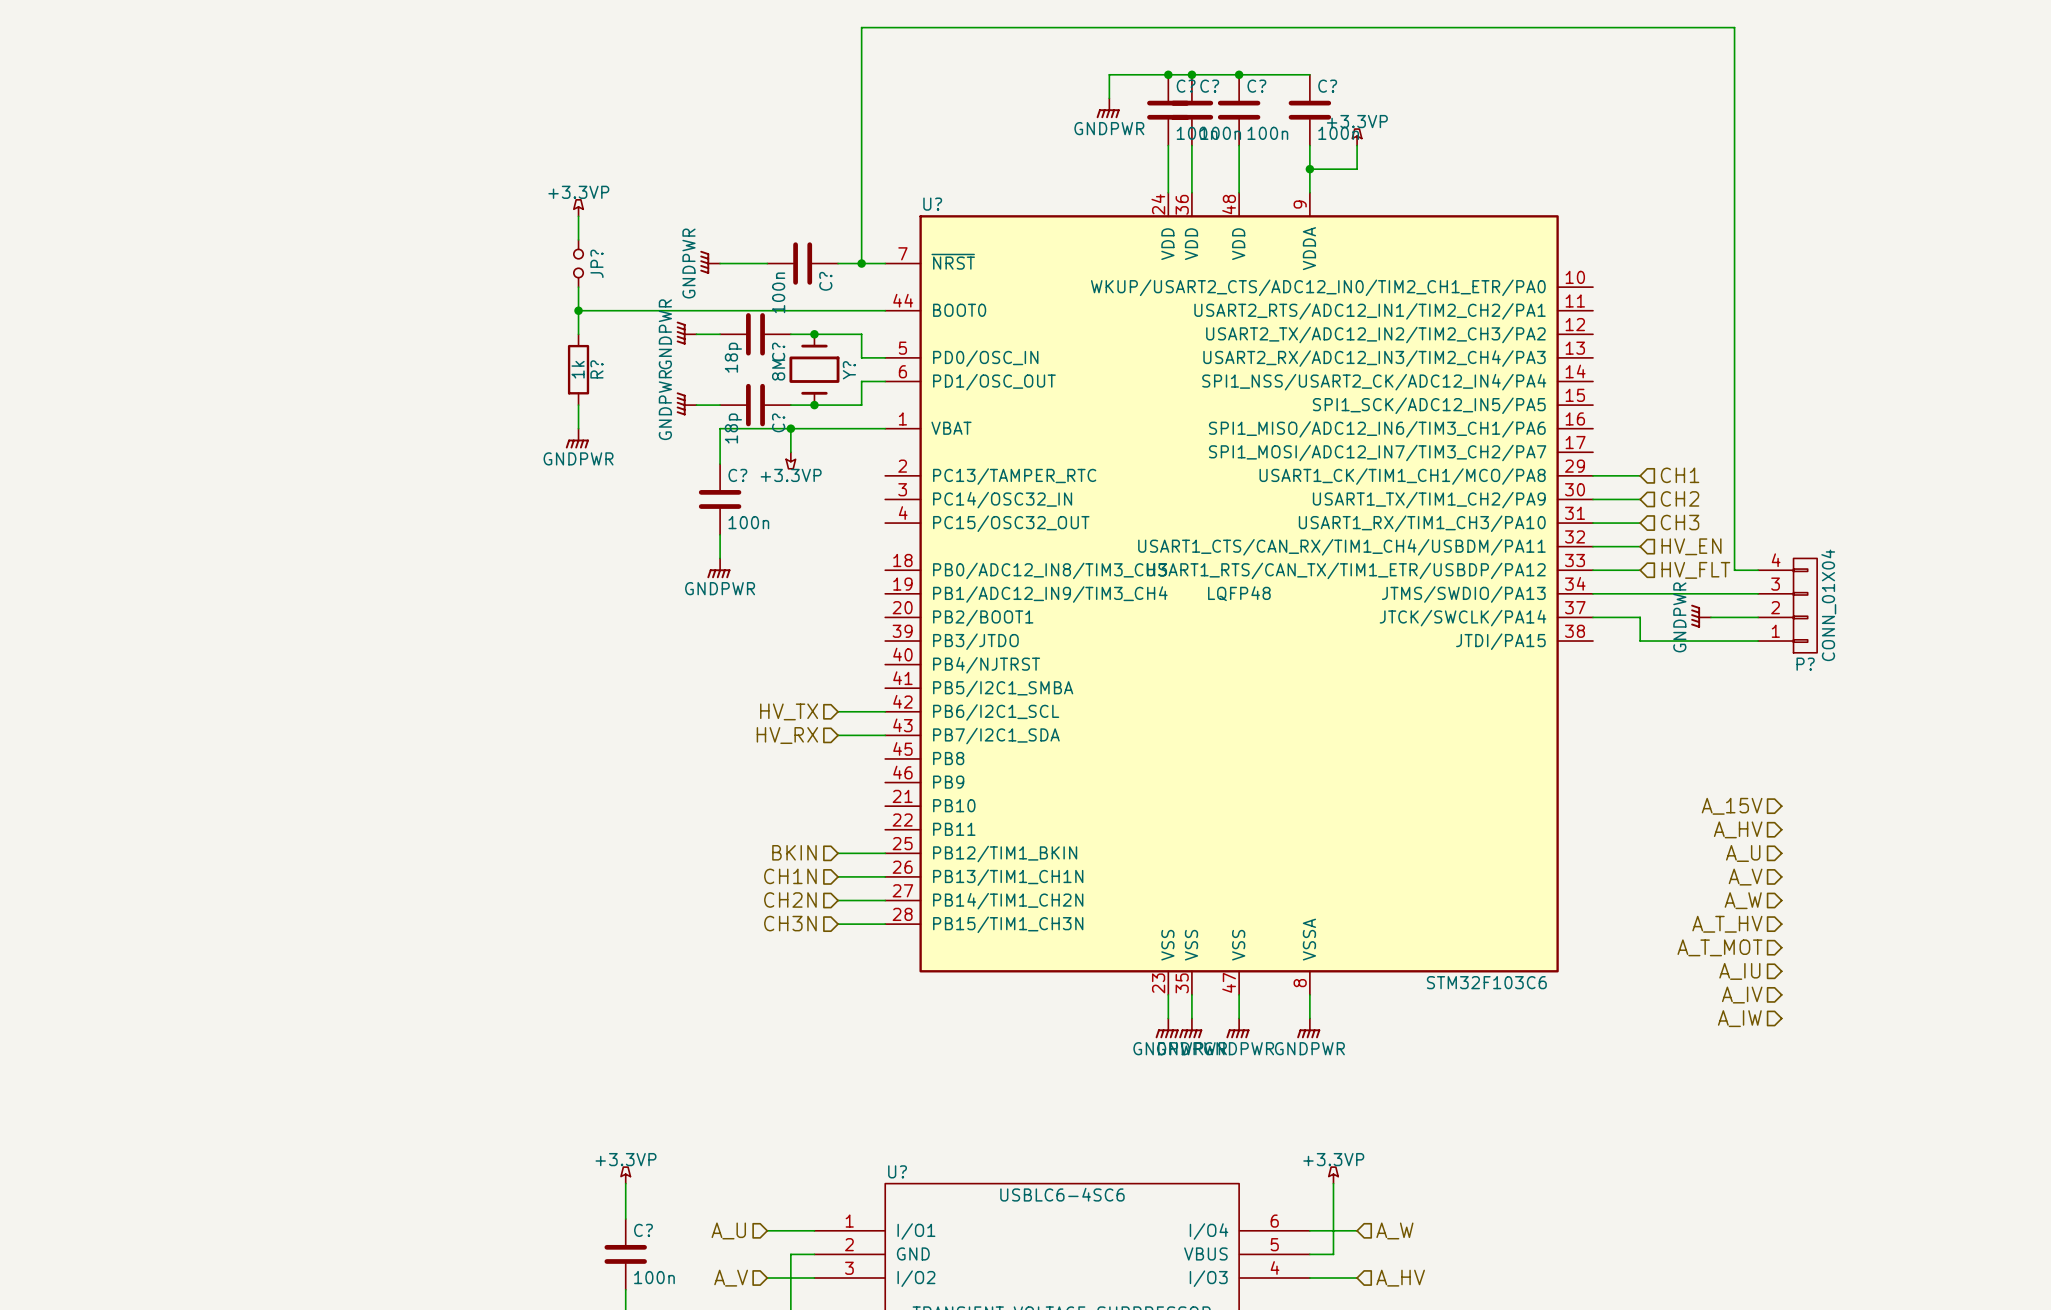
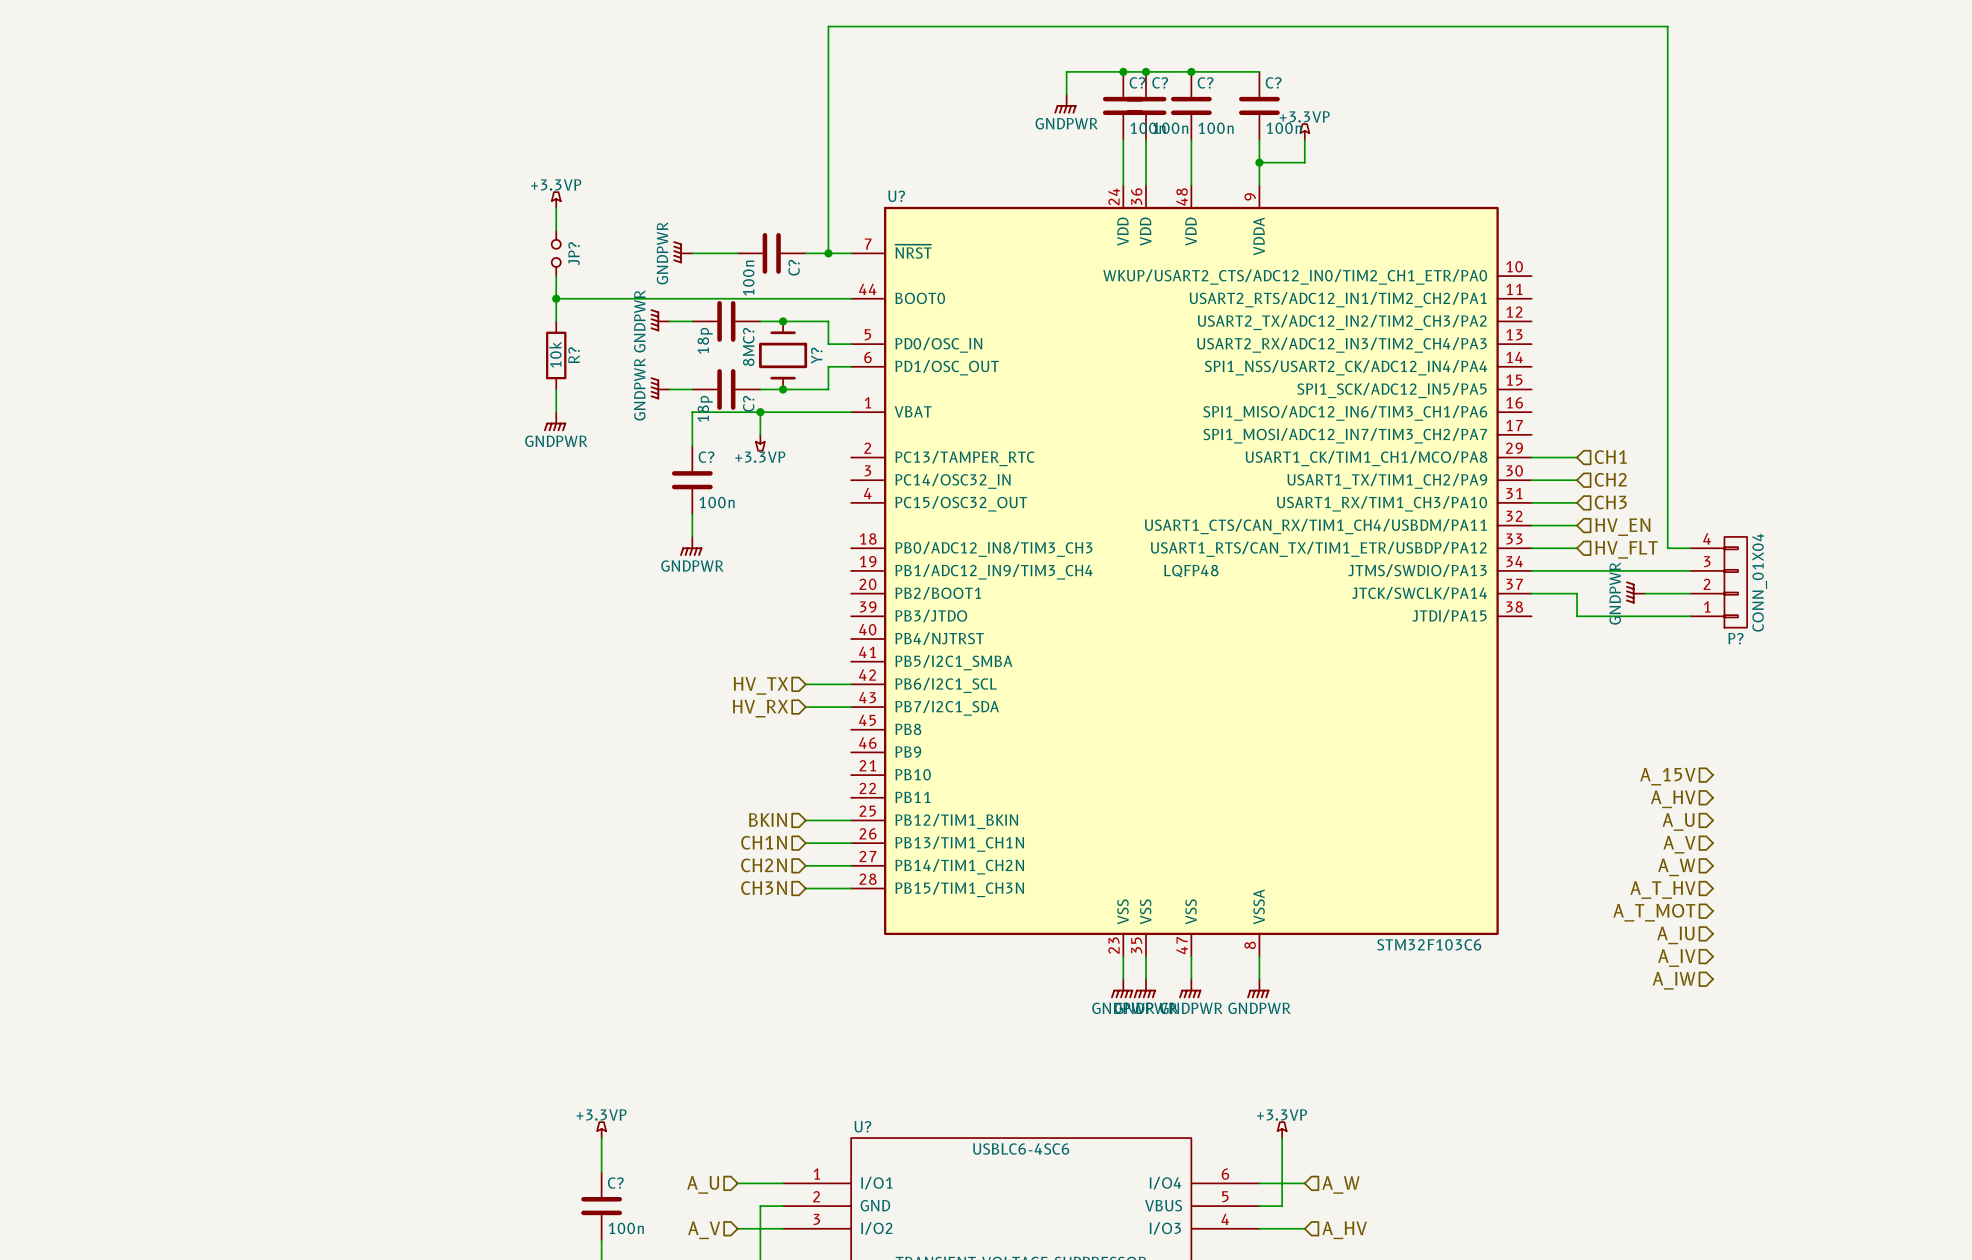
R? value: 1k (578, 369) -> 10k (555, 354)

